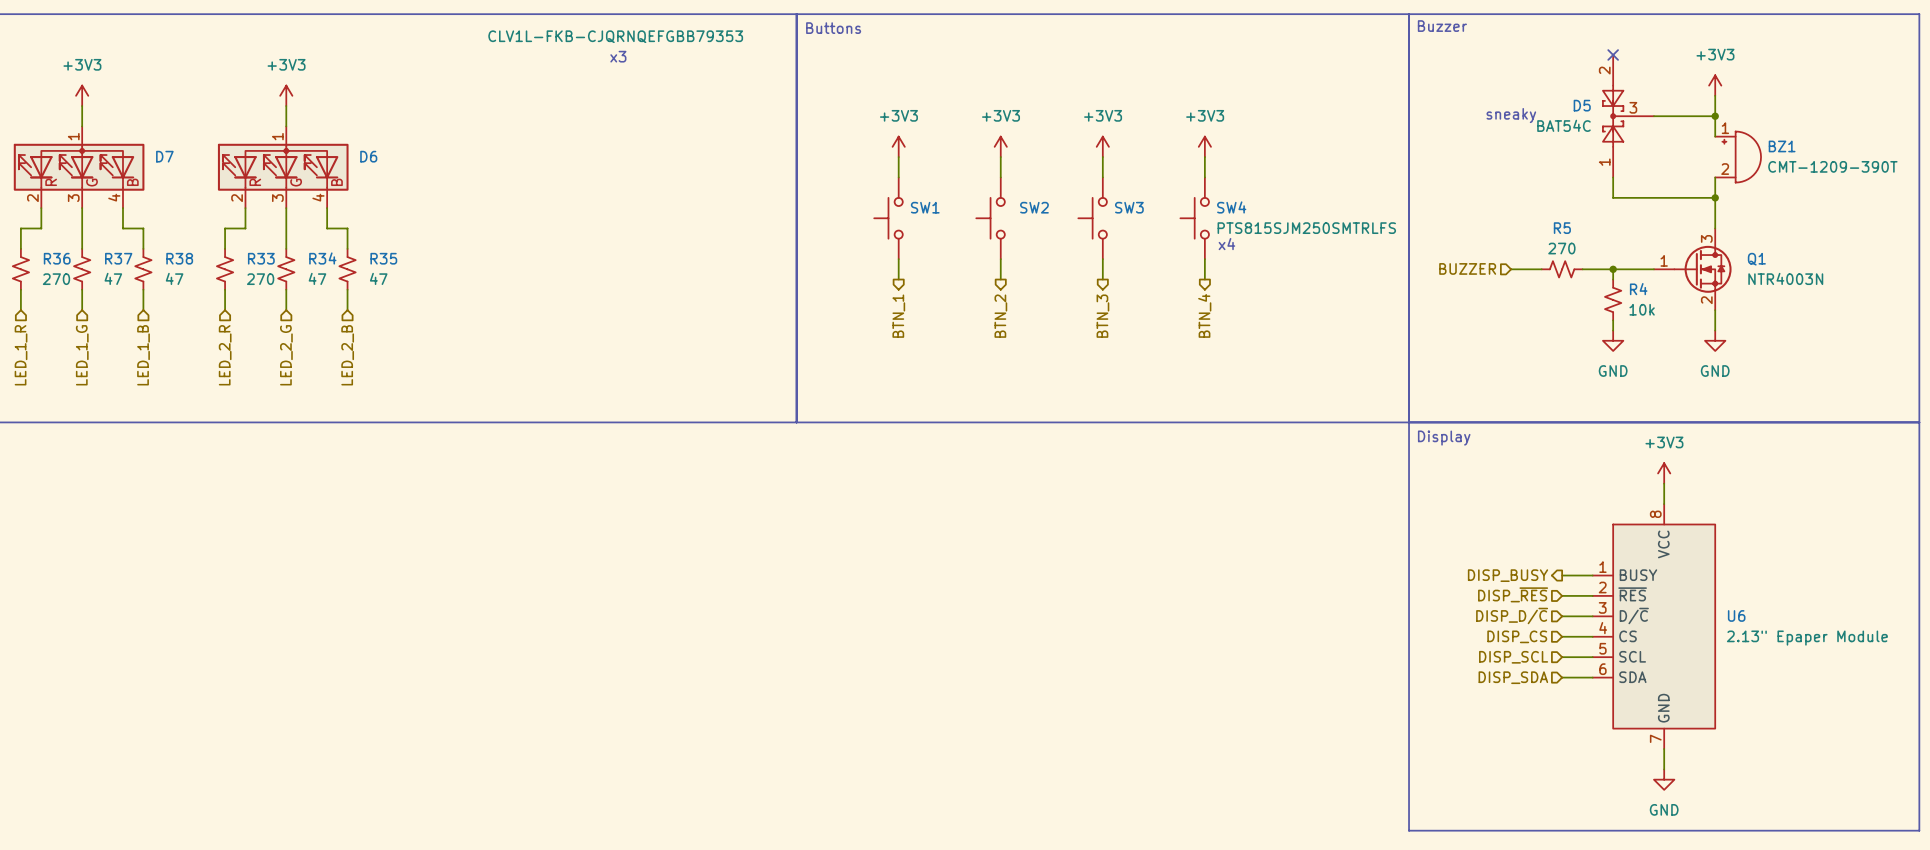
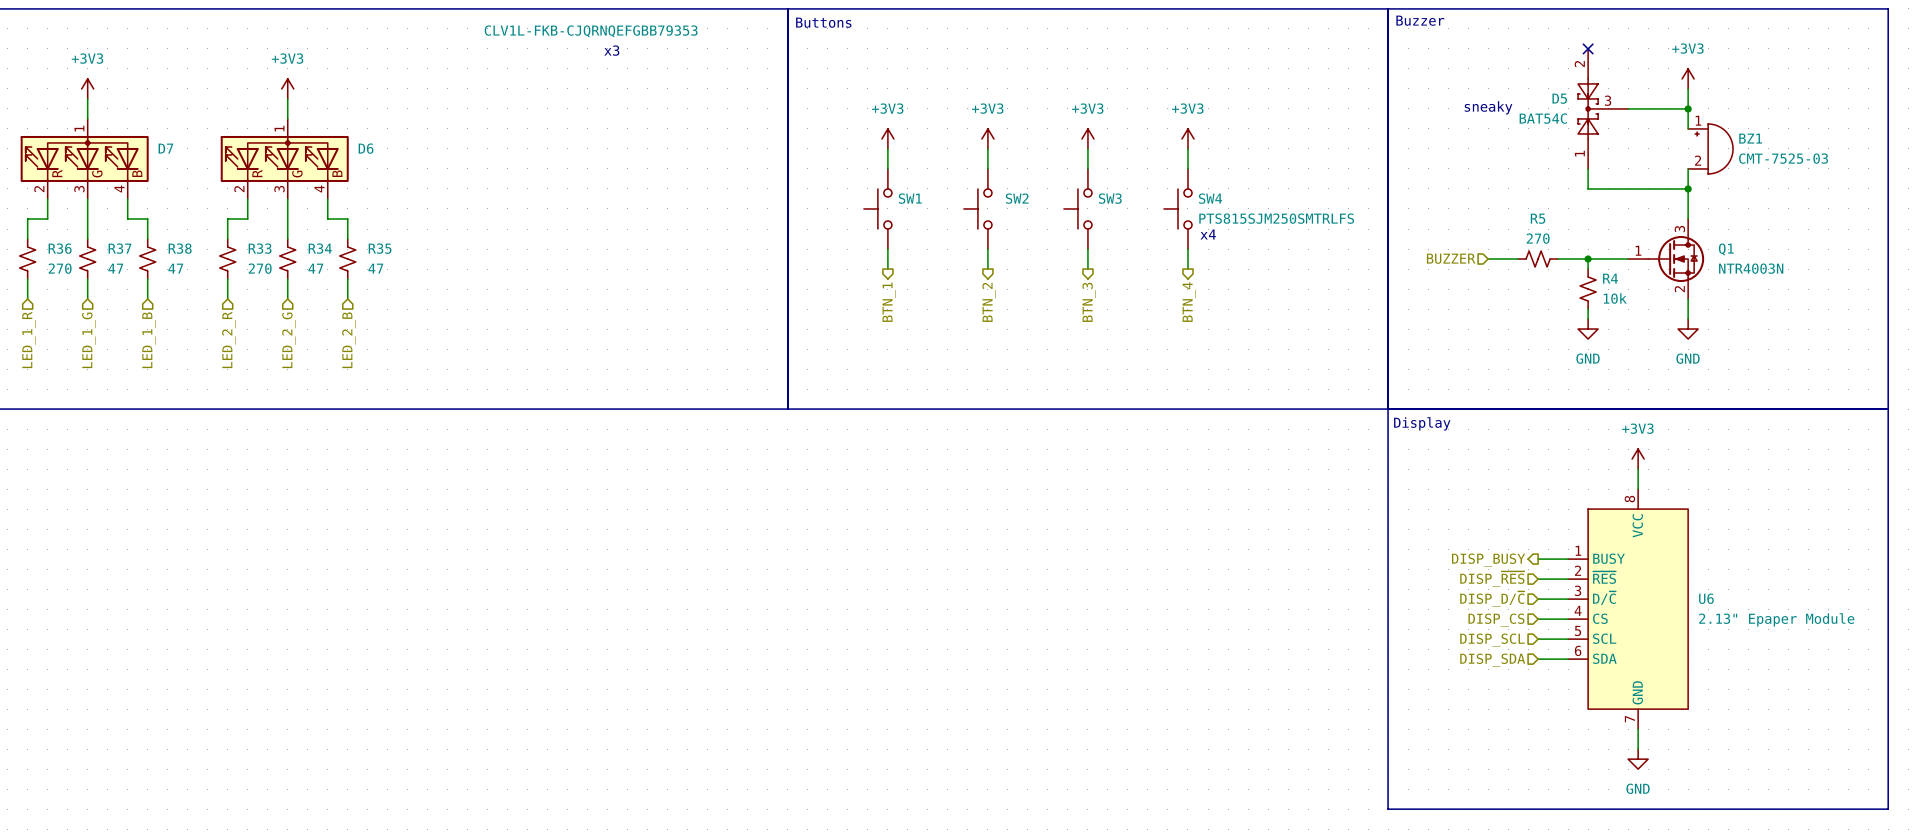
BZ1 value: CMT-1209-390T (1832, 166) -> CMT-7525-03 (1783, 158)

